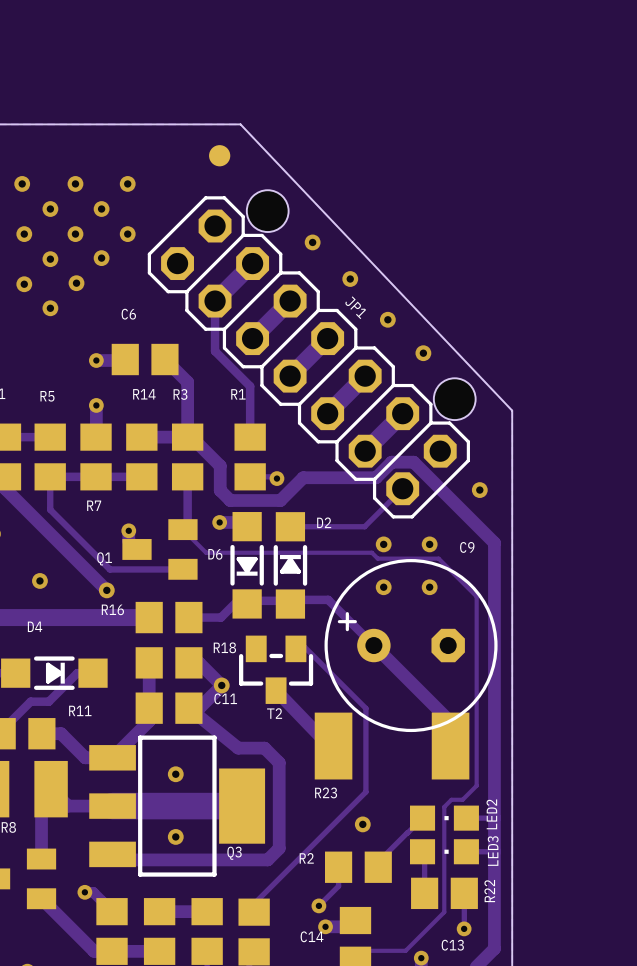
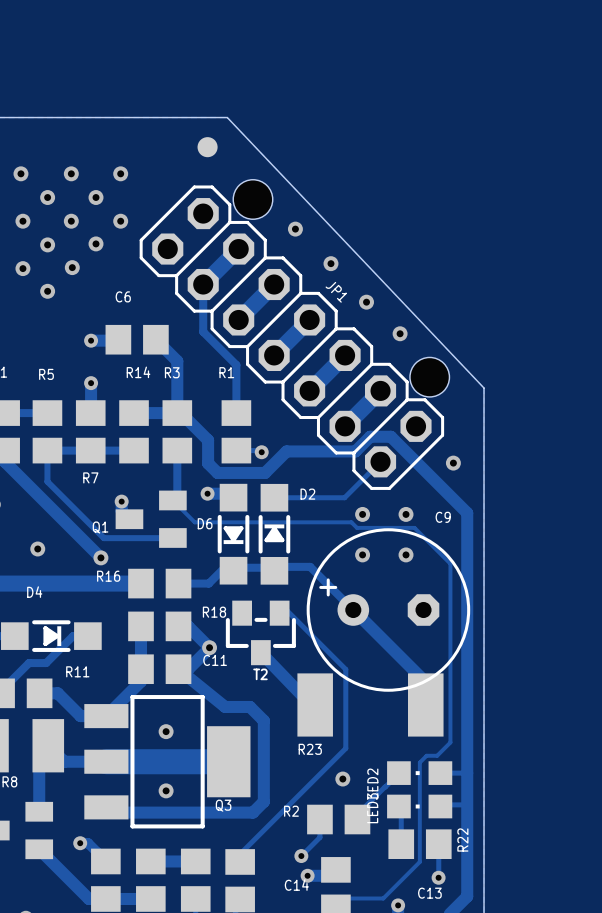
LED2 rotation: 0° (444, 818) -> 180° (419, 773)
LED3 rotation: 0° (444, 851) -> 180° (419, 806)

